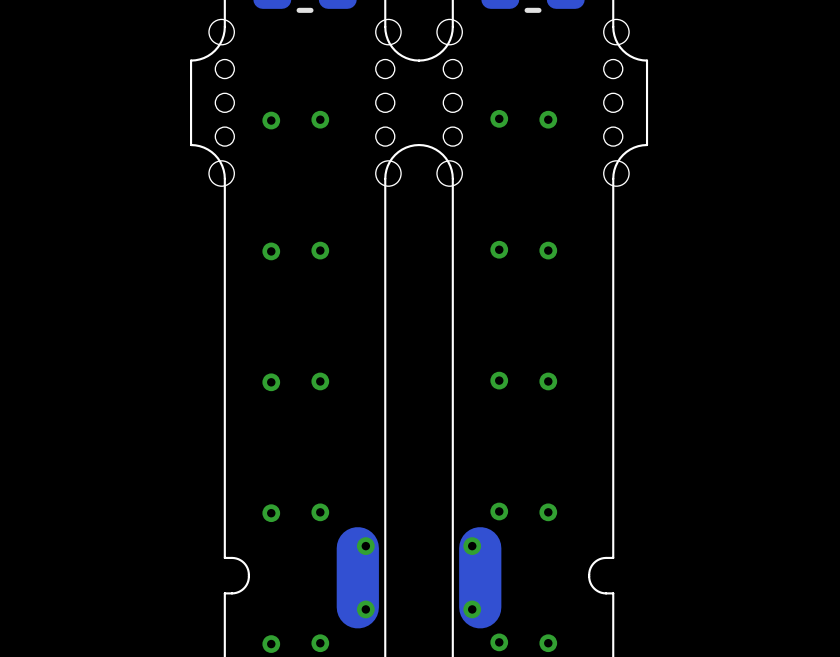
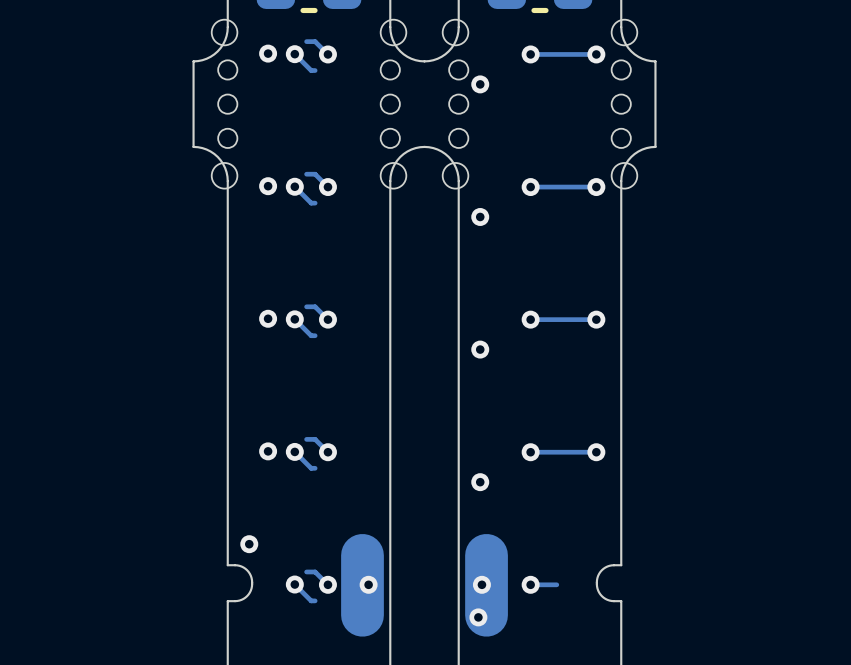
track: none -> (306, 41) (315, 41) (327, 54)
via: none -> (268, 53)
track: none -> (294, 54) (311, 70) (315, 70)
via: none -> (294, 54)
via: none -> (327, 54)
via: none -> (530, 54)
via: none -> (596, 54)
track: none -> (601, 54) (530, 54)
via: none -> (480, 84)
via: (499, 118) -> none
via: (320, 119) -> none
via: (548, 119) -> none
via: (271, 120) -> none
track: none -> (306, 174) (315, 174) (327, 187)
via: none -> (268, 186)
track: none -> (294, 186) (311, 203) (315, 203)
via: none -> (294, 186)
via: none -> (327, 187)
via: none -> (530, 187)
via: none -> (596, 187)
track: none -> (601, 187) (530, 187)
via: none -> (480, 216)
via: (499, 249) -> none
via: (320, 250) -> none
via: (548, 250) -> none
via: (271, 251) -> none
track: none -> (306, 306) (315, 306) (327, 319)
via: none -> (268, 318)
track: none -> (294, 319) (311, 335) (315, 335)
via: none -> (294, 319)
via: none -> (327, 319)
via: none -> (530, 319)
via: none -> (596, 319)
track: none -> (601, 319) (530, 319)
via: none -> (480, 349)
via: (499, 380) -> none
via: (320, 381) -> none
via: (548, 381) -> none
via: (271, 382) -> none
track: none -> (306, 439) (315, 439) (327, 452)
via: none -> (268, 451)
track: none -> (294, 451) (311, 468) (315, 468)
via: none -> (294, 451)
via: none -> (327, 452)
via: none -> (530, 452)
via: none -> (596, 452)
track: none -> (601, 452) (530, 452)
via: none -> (480, 482)
via: (499, 511) -> none
via: (320, 512) -> none
via: (548, 512) -> none
via: (271, 513) -> none
via: none -> (249, 544)
via: (365, 546) -> none
via: (472, 546) -> none
track: none -> (306, 571) (315, 571) (327, 584)
track: none -> (294, 584) (311, 600) (315, 600)
via: none -> (294, 584)
via: none -> (327, 584)
via: none -> (368, 584)
via: none -> (481, 584)
via: none -> (530, 584)
track: none -> (556, 584) (530, 584)
via: (365, 609) -> none
via: (499, 642) -> none
via: (320, 643) -> none
via: (548, 643) -> none
via: (271, 644) -> none

